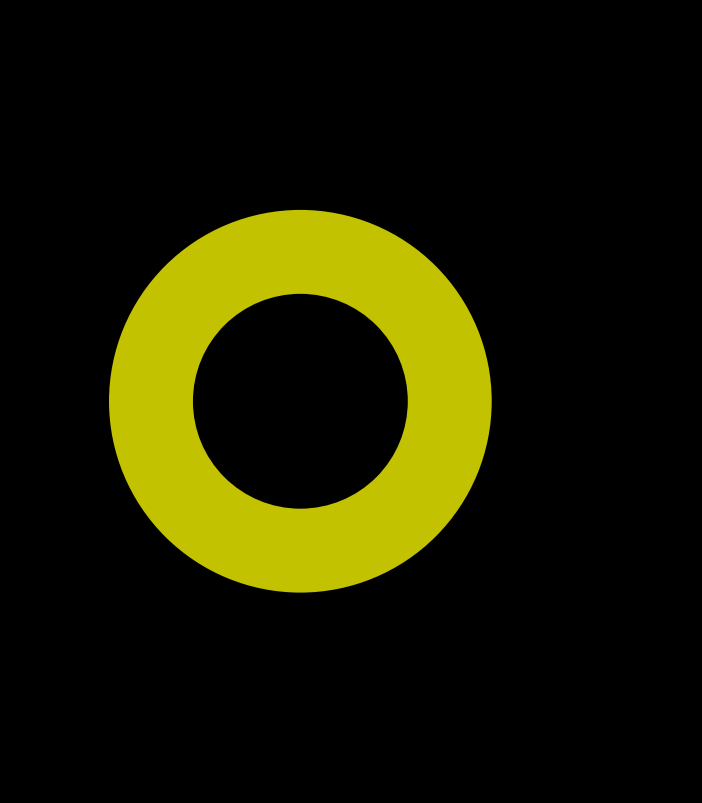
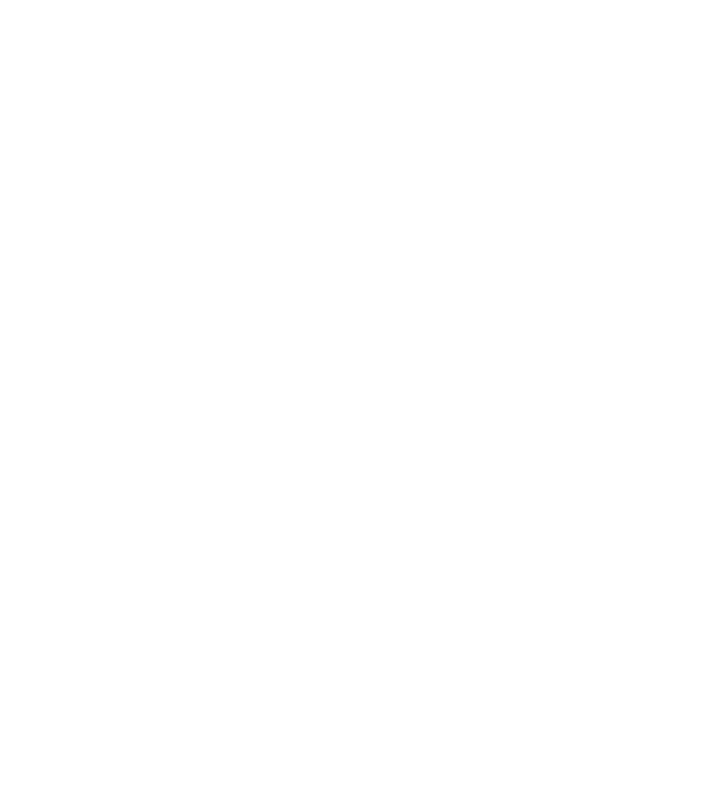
part: (300, 401) -> none

